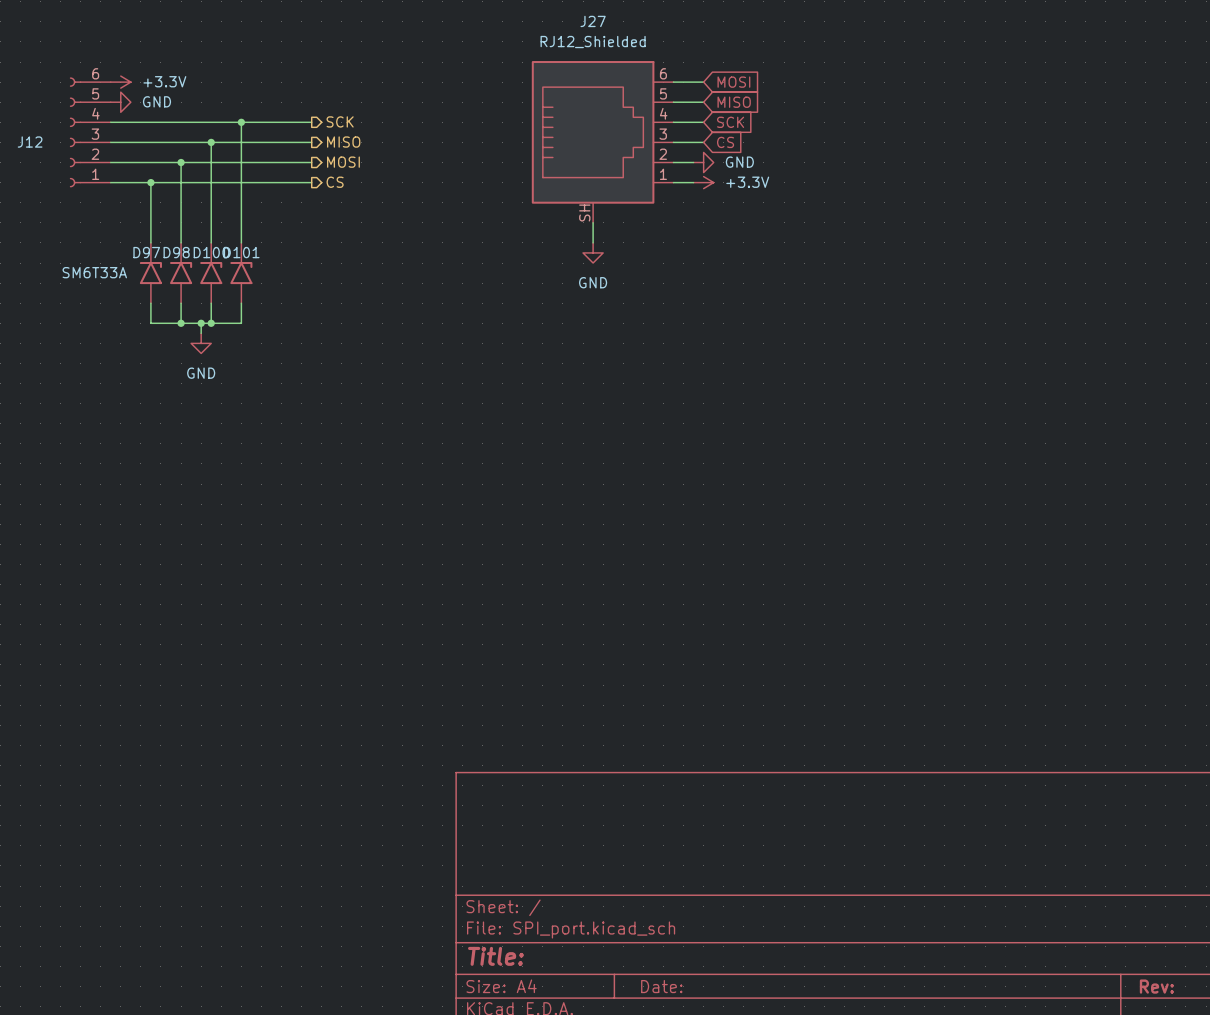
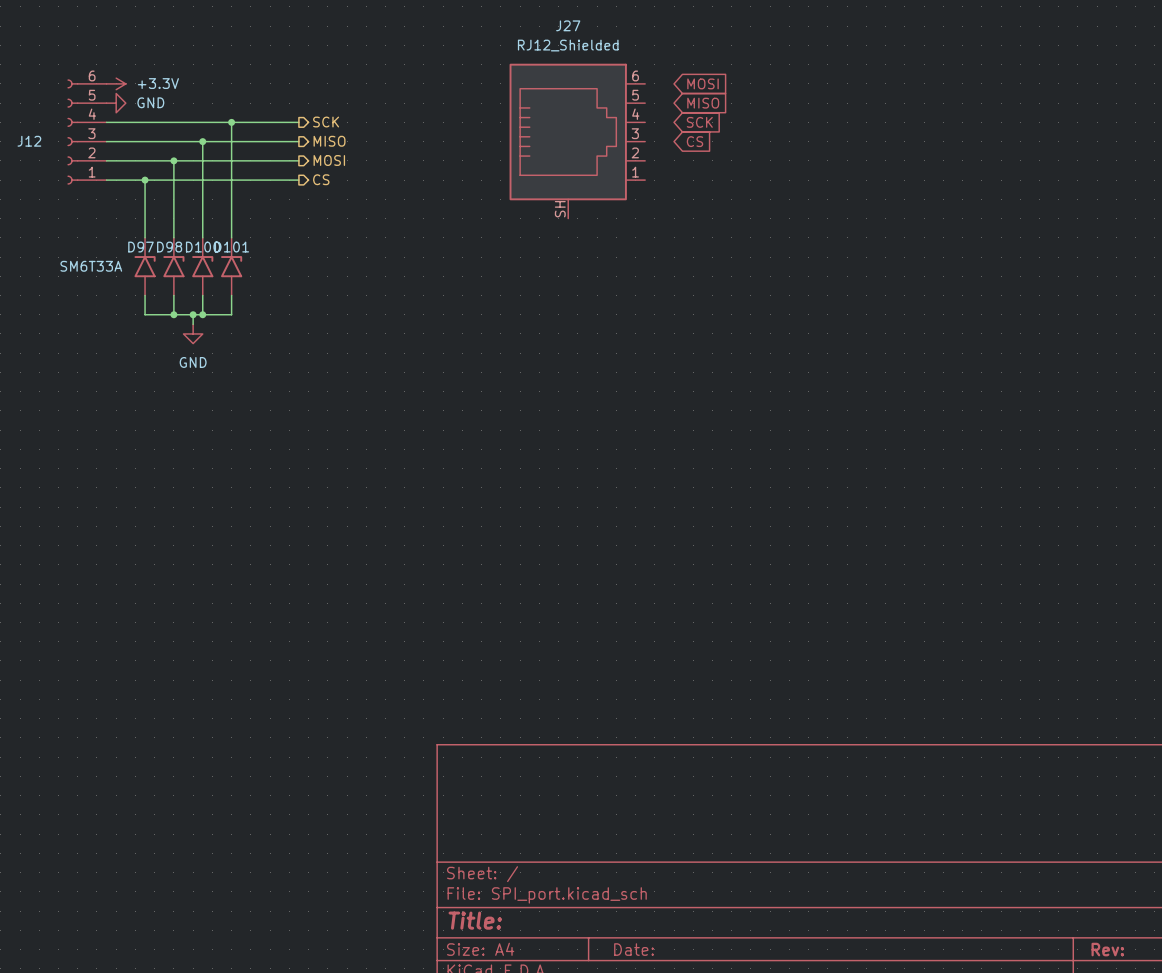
wire: (673, 82) (703, 82) -> none
wire: (673, 102) (703, 102) -> none
wire: (673, 122) (703, 122) -> none
wire: (673, 142) (703, 142) -> none
wire: (673, 162) (693, 162) -> none
power symbol: GND (703, 162) -> none
wire: (673, 182) (693, 182) -> none
power symbol: +3.3V (703, 182) -> none
wire: (593, 222) (593, 242) -> none
power symbol: GND (593, 252) -> none

